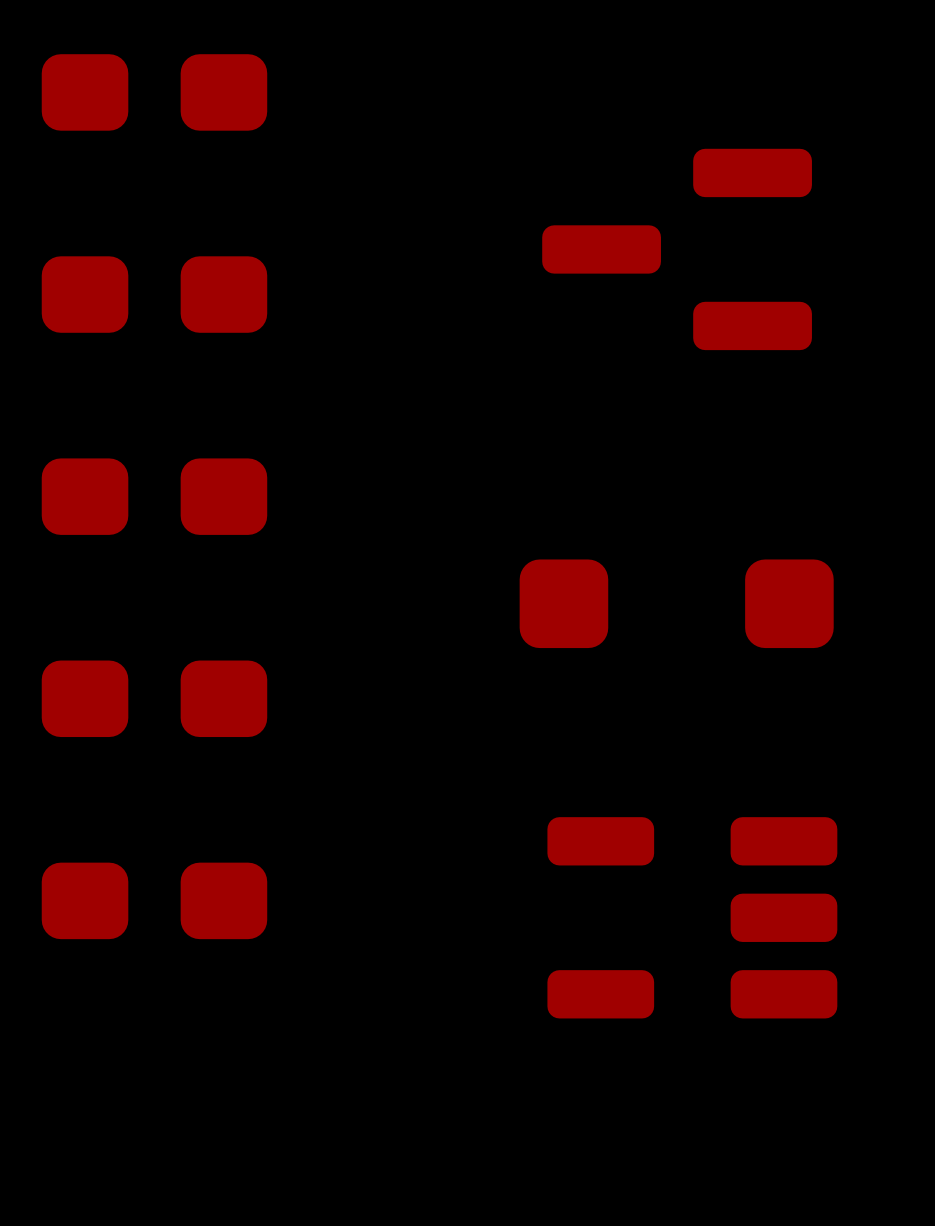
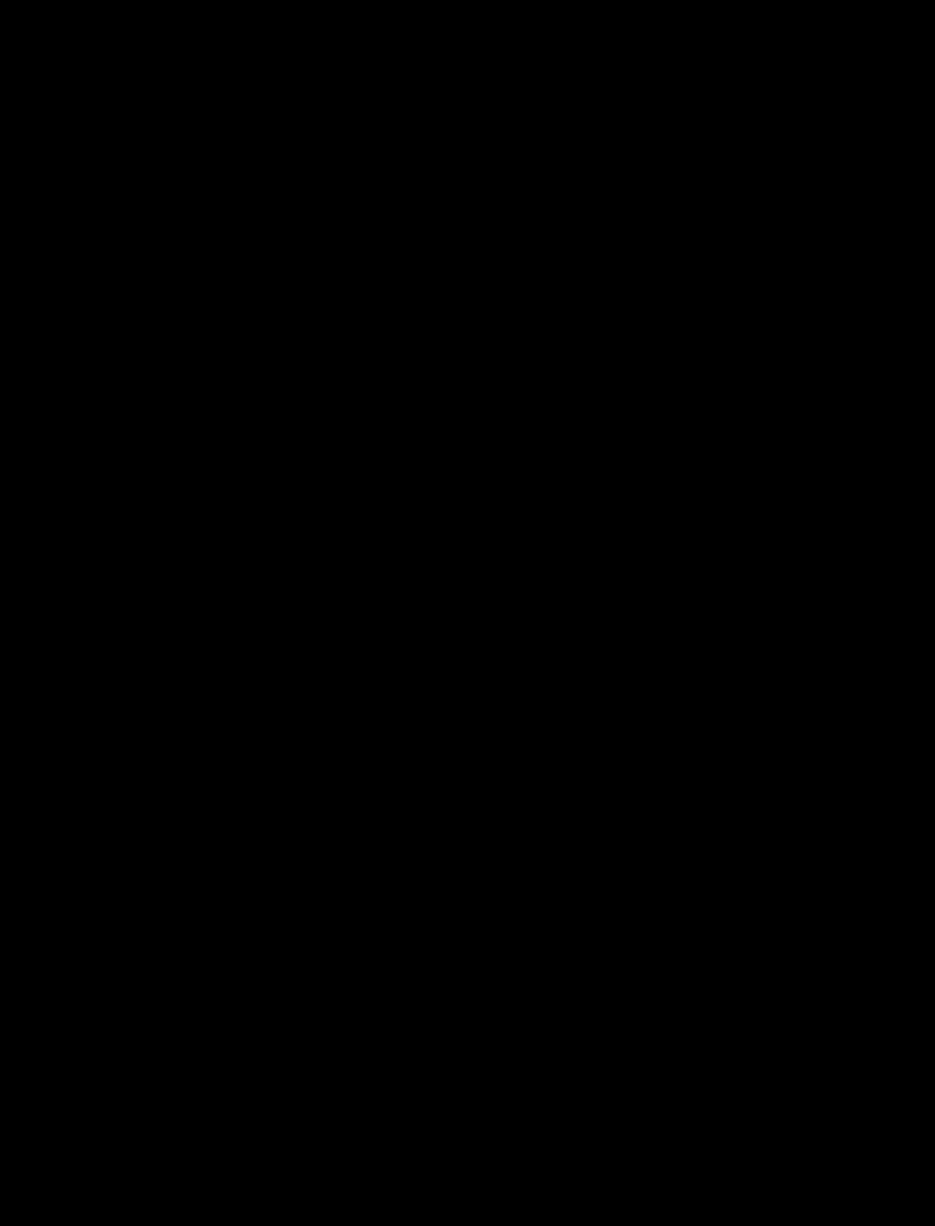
part: (154, 92) -> none
part: (677, 249) -> none
part: (154, 294) -> none
part: (154, 496) -> none
part: (676, 603) -> none
part: (154, 698) -> none
part: (154, 900) -> none
part: (692, 917) -> none

